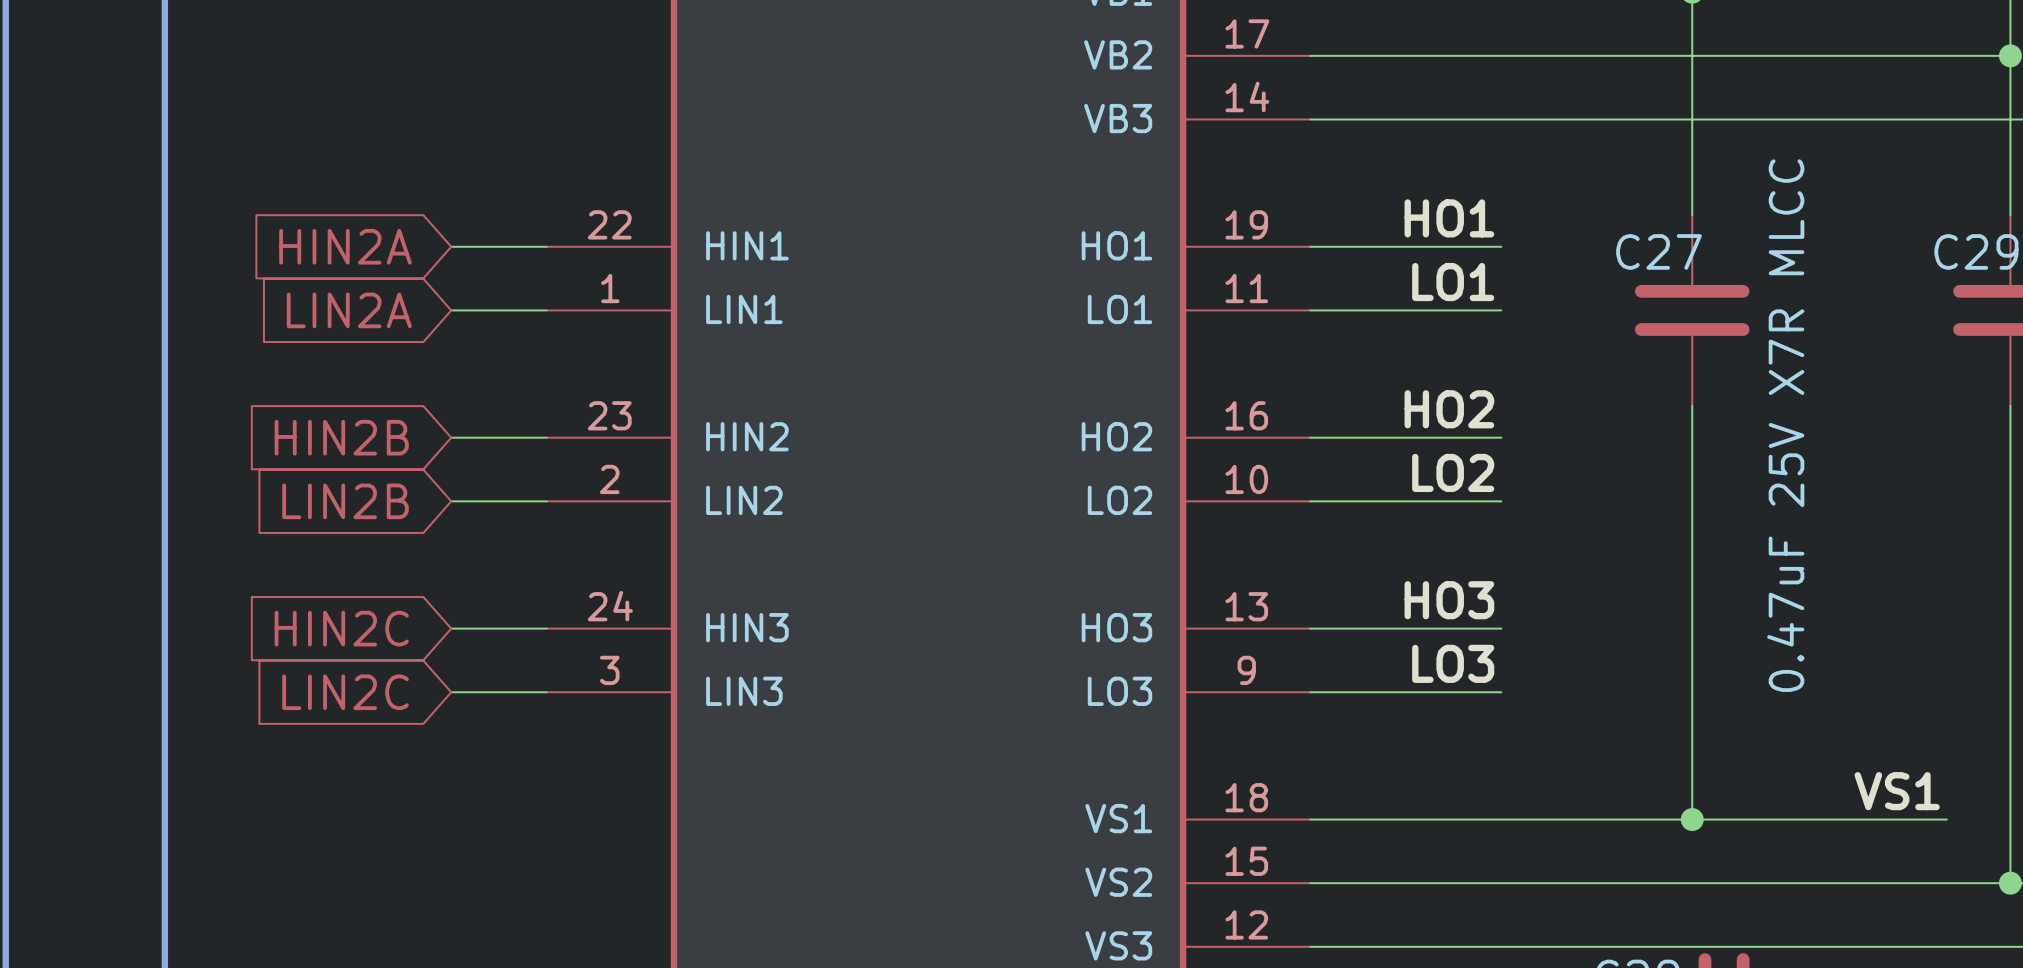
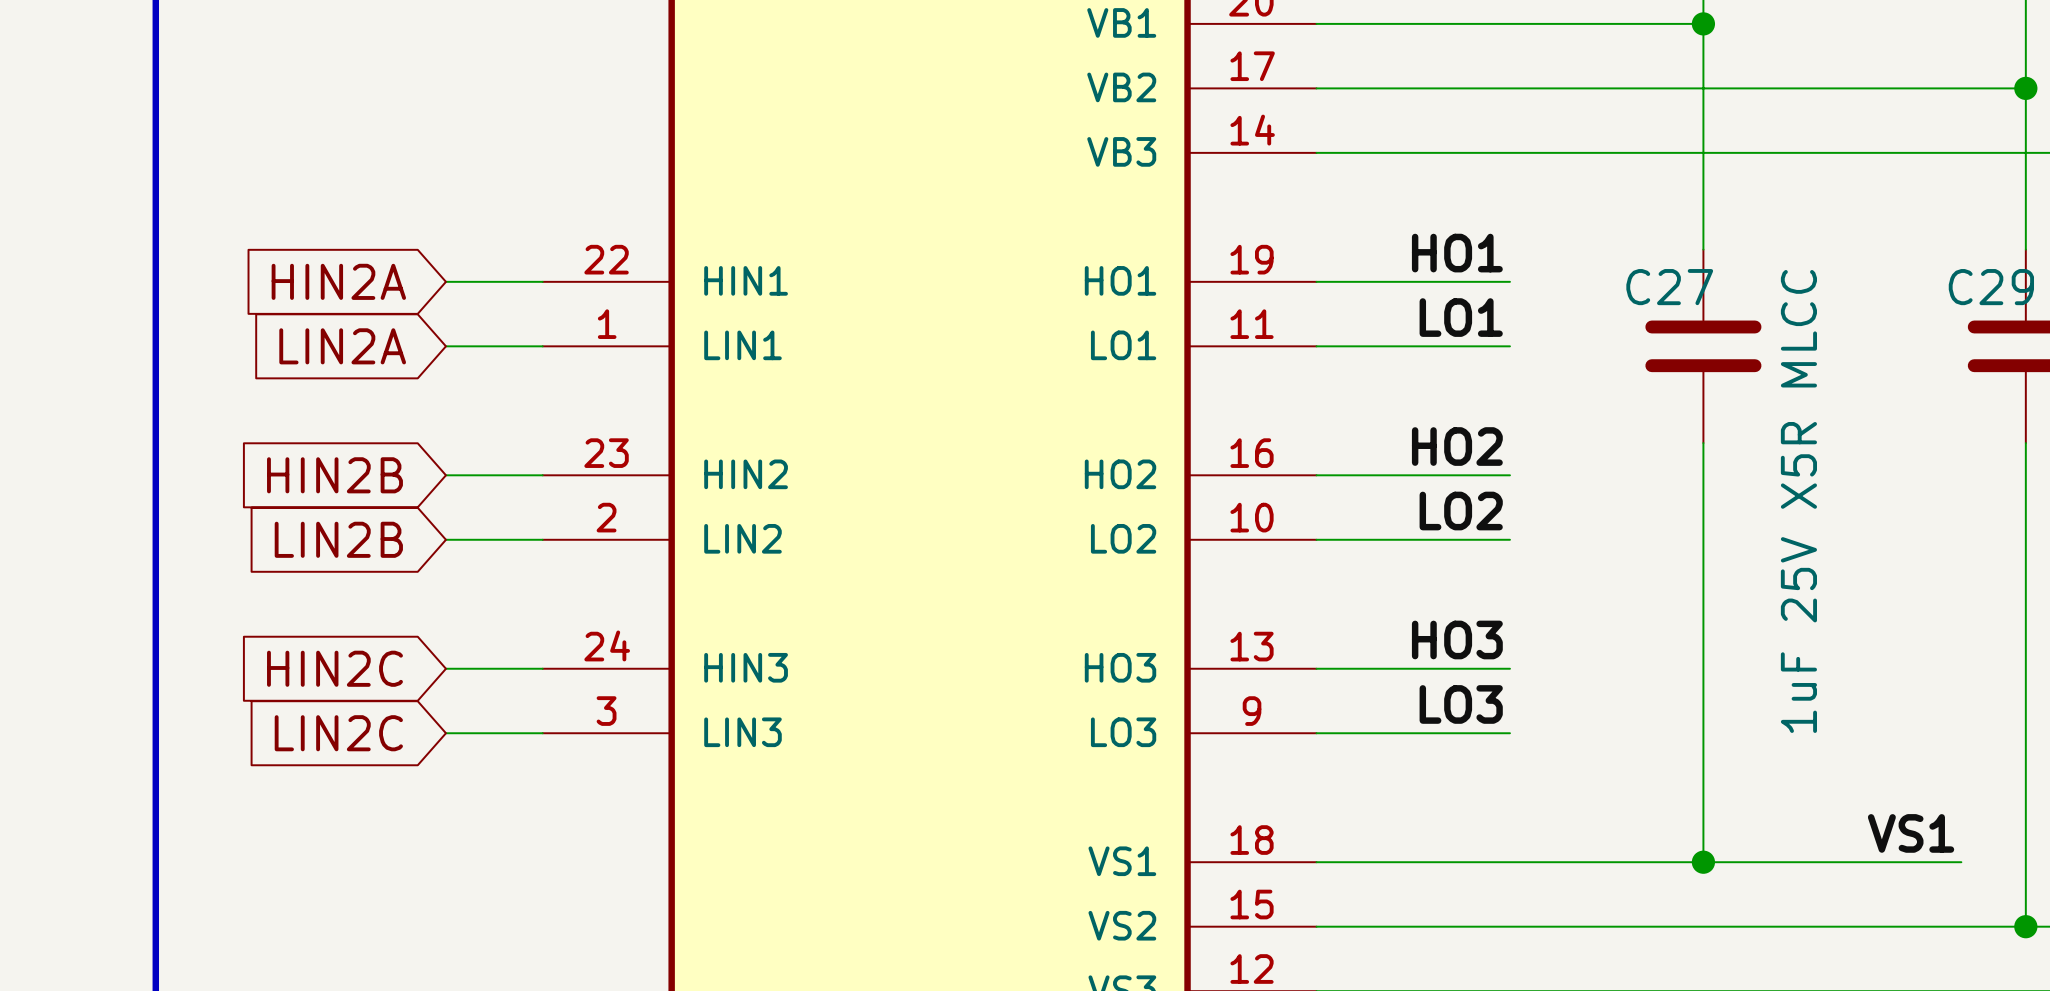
C27 value: 0.47uF 25V X7R MLCC (1785, 425) -> 1uF 25V X5R MLCC (1798, 501)

